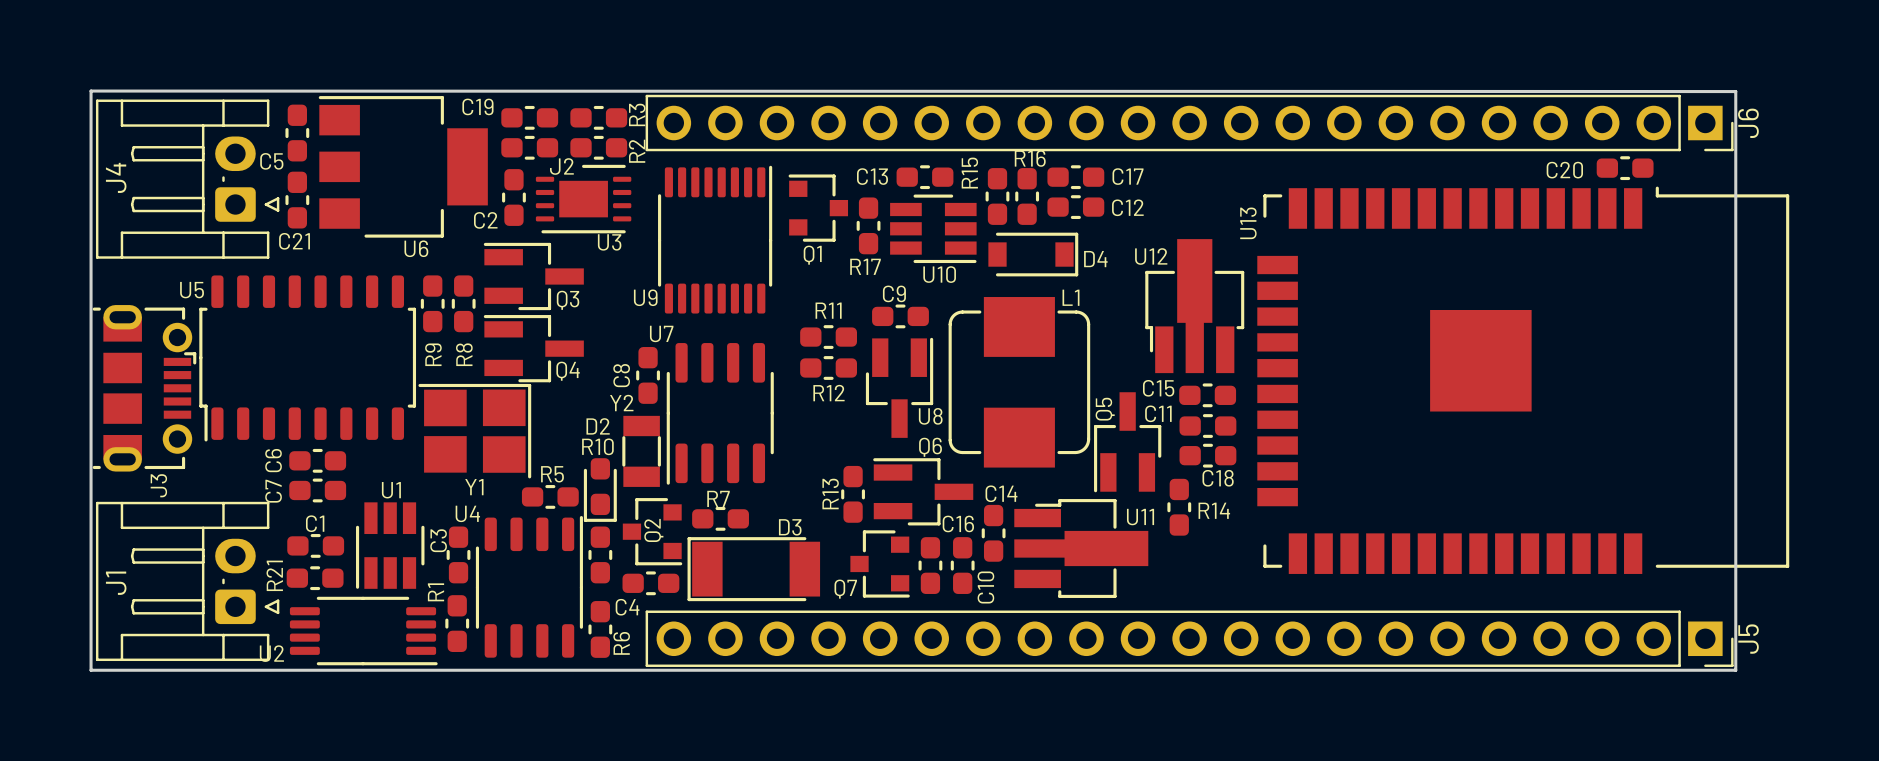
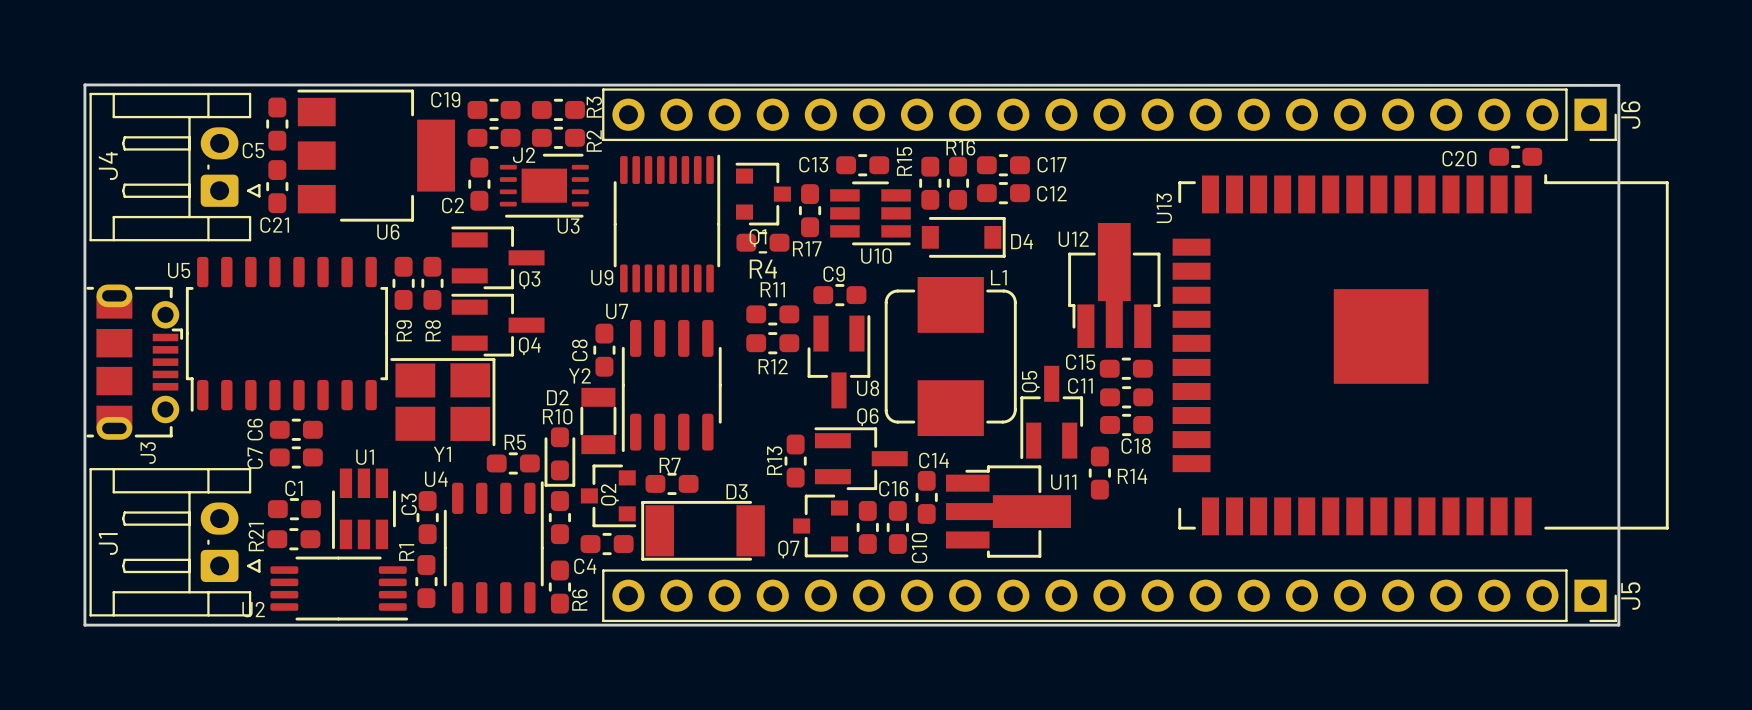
R4: none -> (762, 242)

